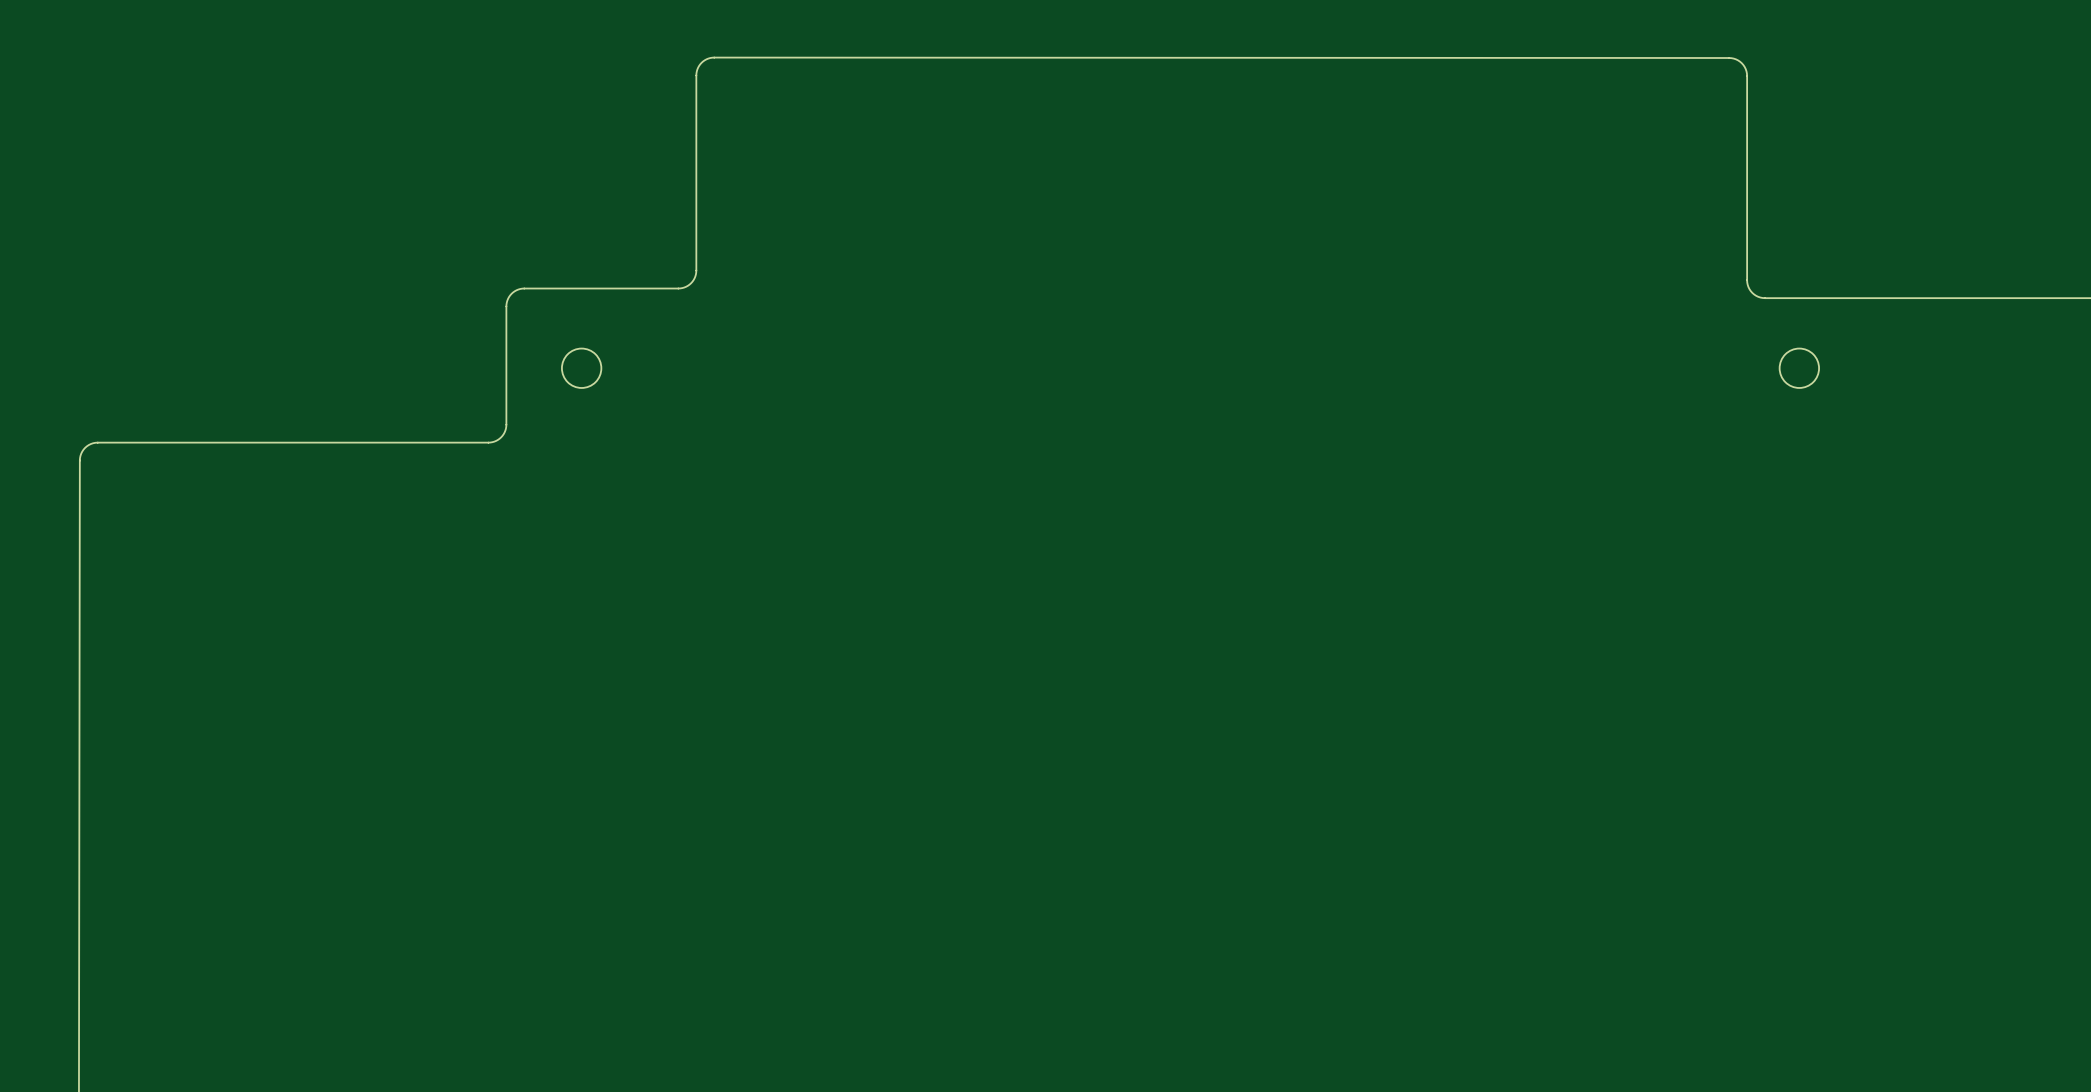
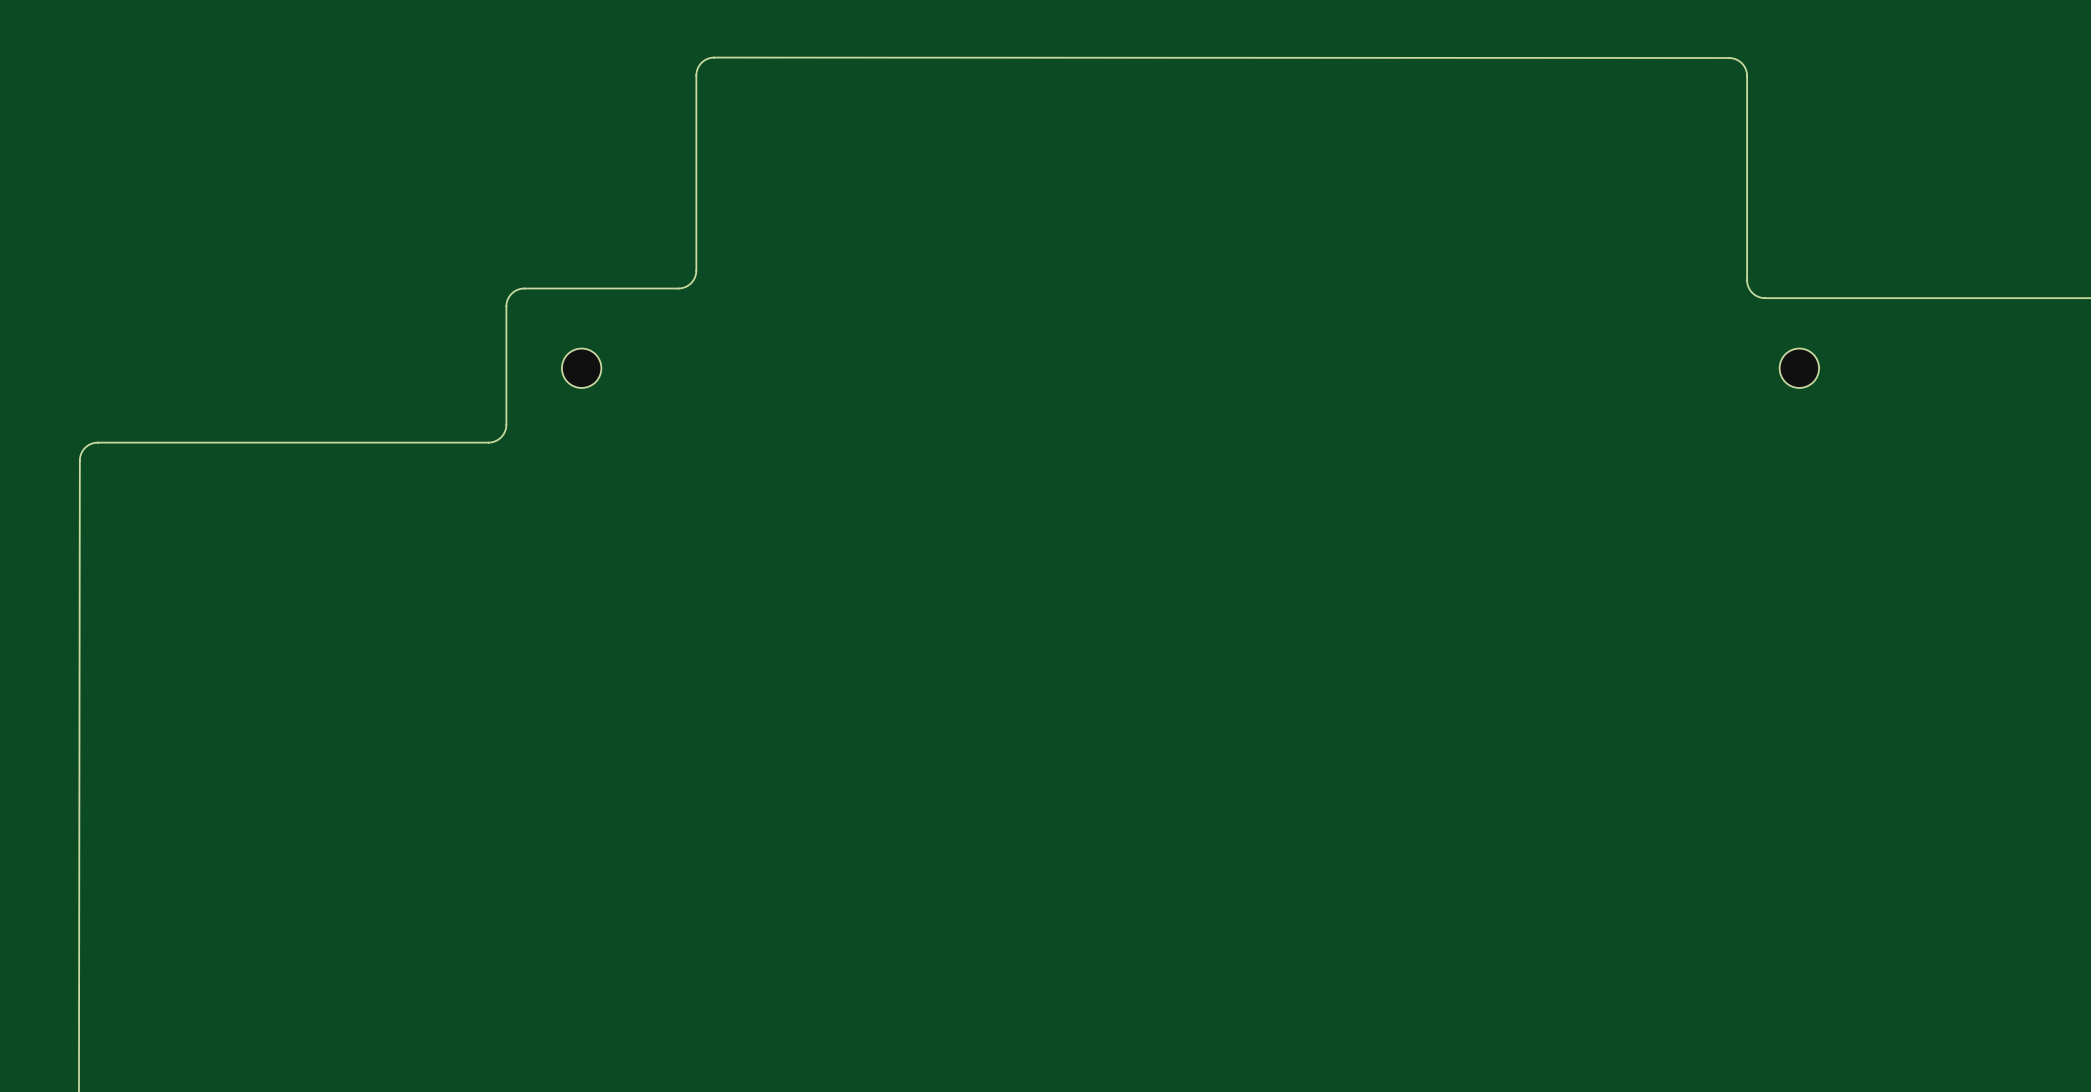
drawing: [561, 348, 602, 389] -> none
drawing: [1779, 348, 1820, 389] -> none
part: none -> (581, 368)
part: none -> (1799, 368)

